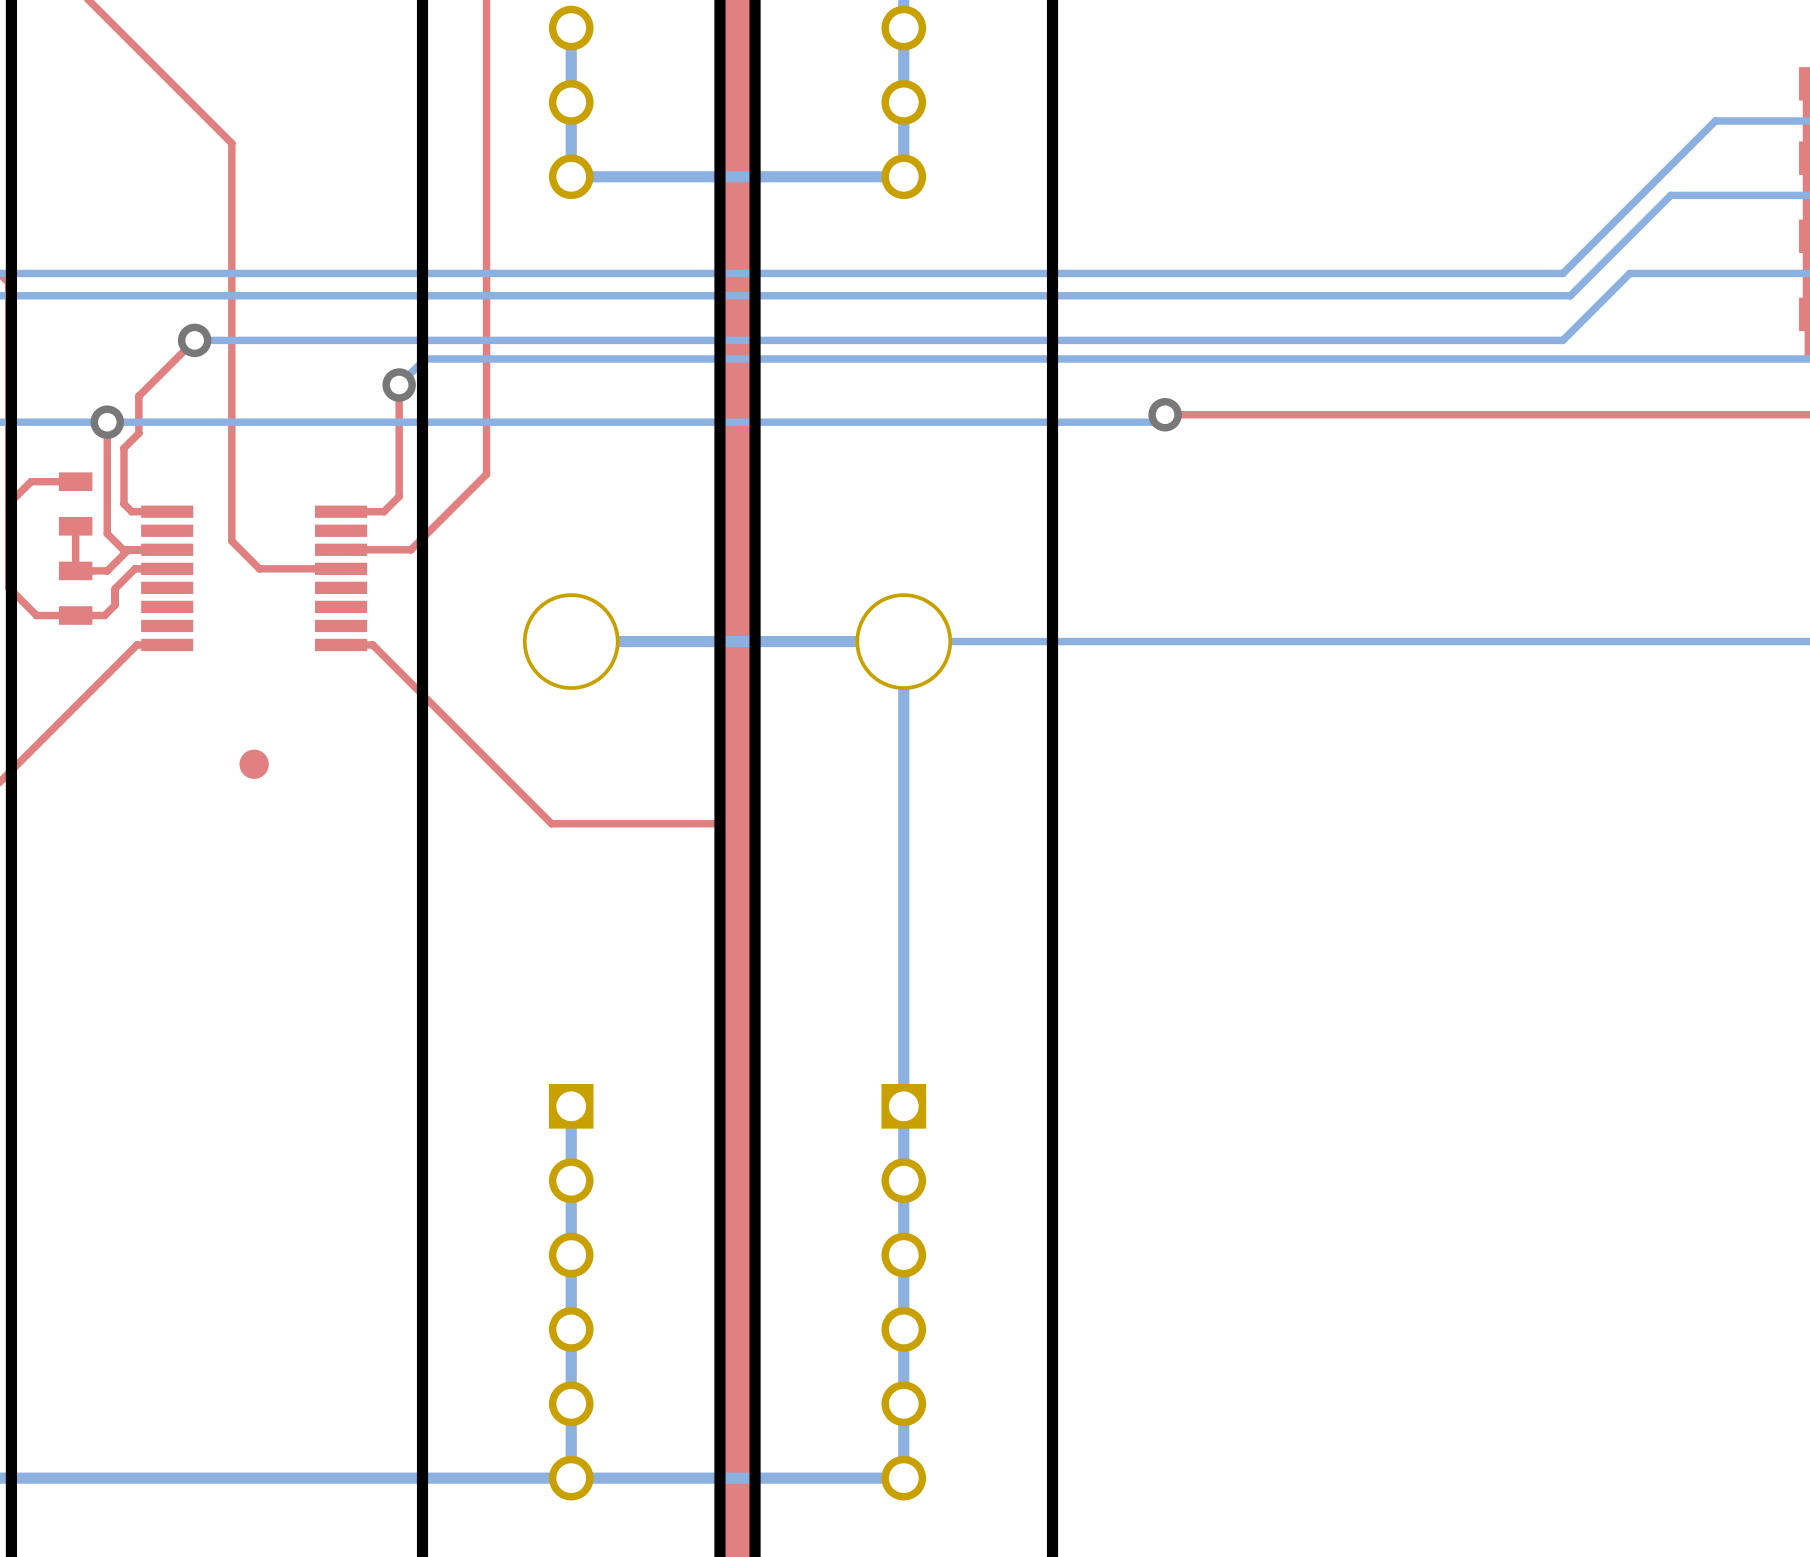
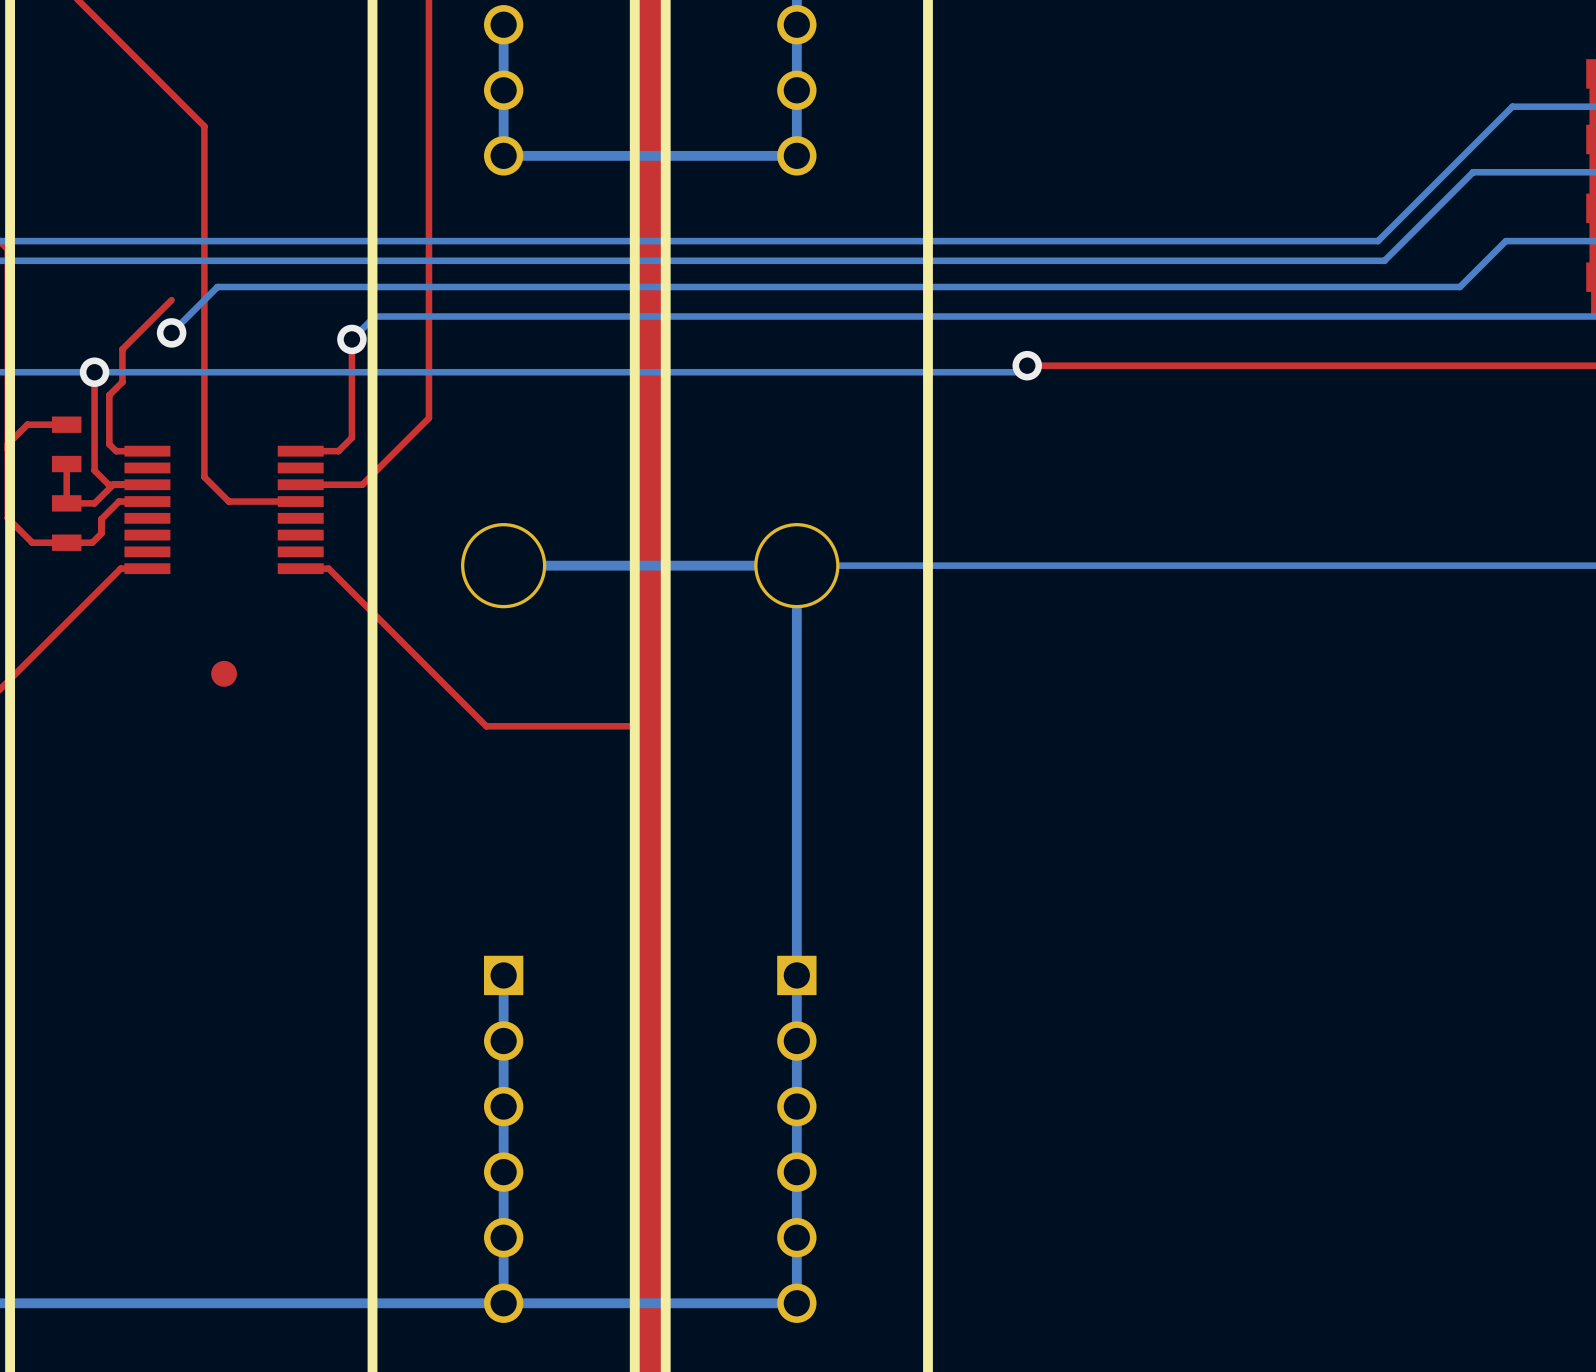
bottom track: (1707, 273) (1629, 273) (1562, 340) (194, 340) -> (1505, 241) (1459, 287) (217, 287) (171, 332)
via position: (194, 340) -> (171, 332)

